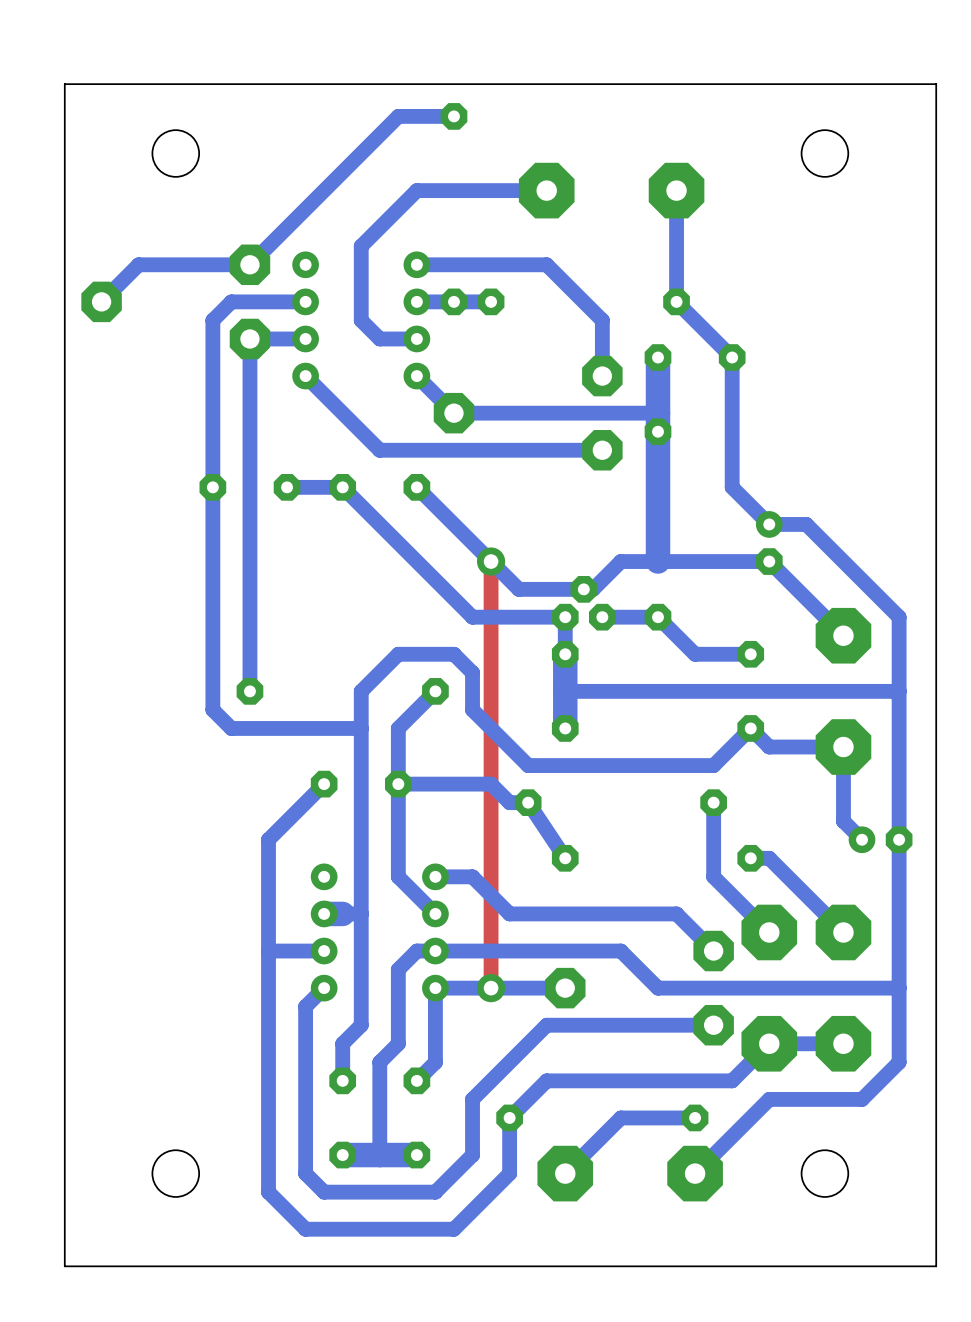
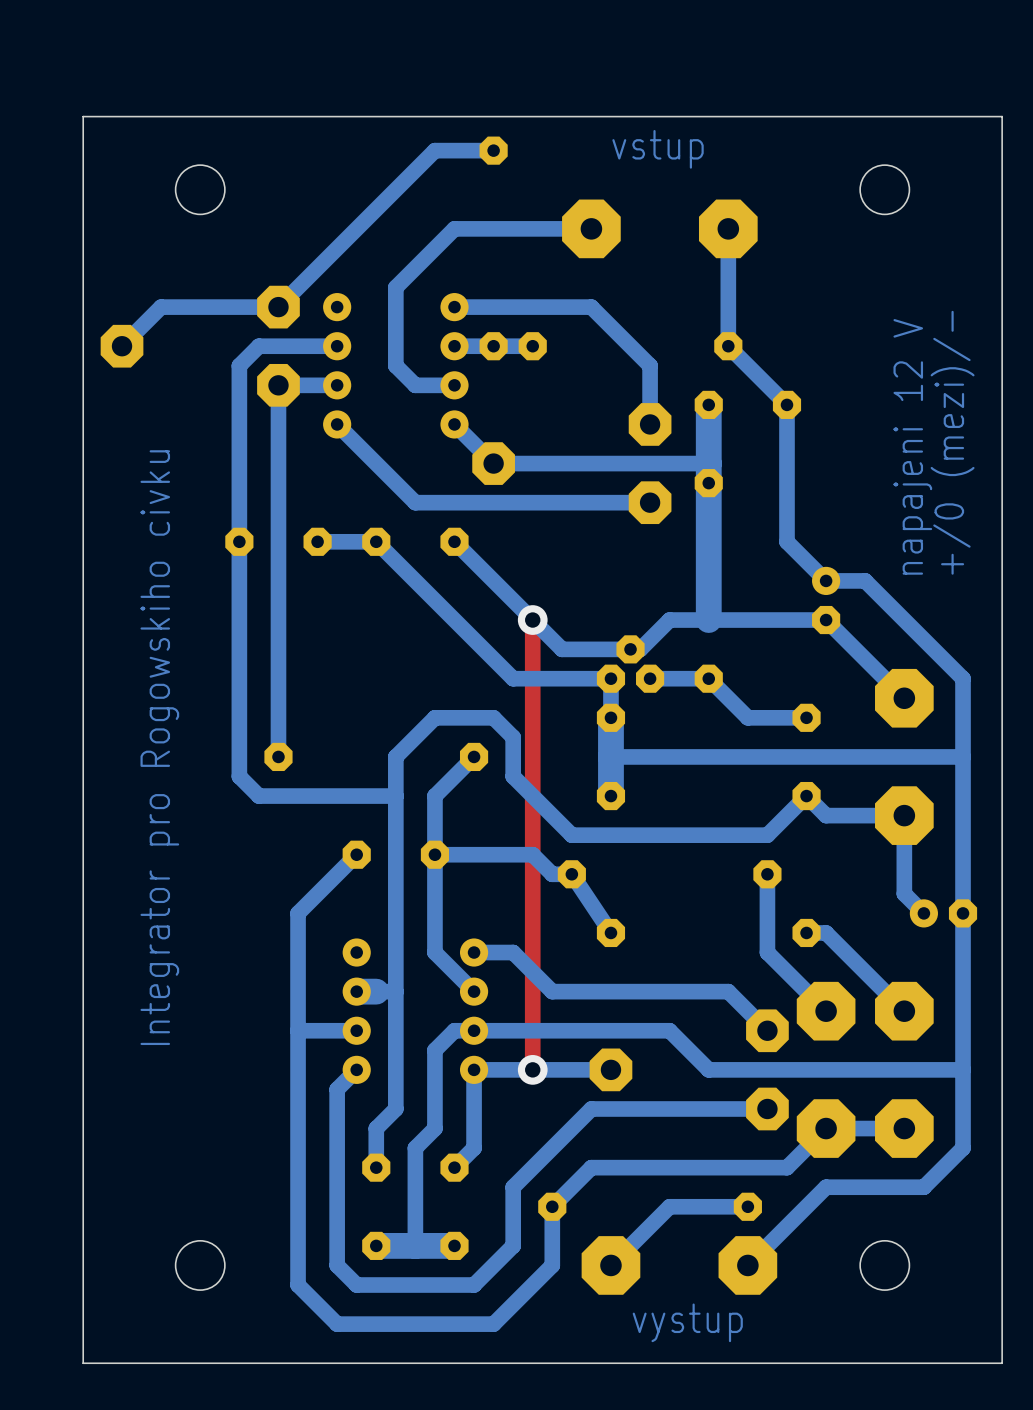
text: none -> vstup (658, 149)
text: none -> napajeni 12 V (912, 446)
text: none -> +/0 (mezi)/- (952, 442)
text: none -> Integrator pro Rogowskiho civku (159, 747)
text: none -> vystup (687, 1322)

